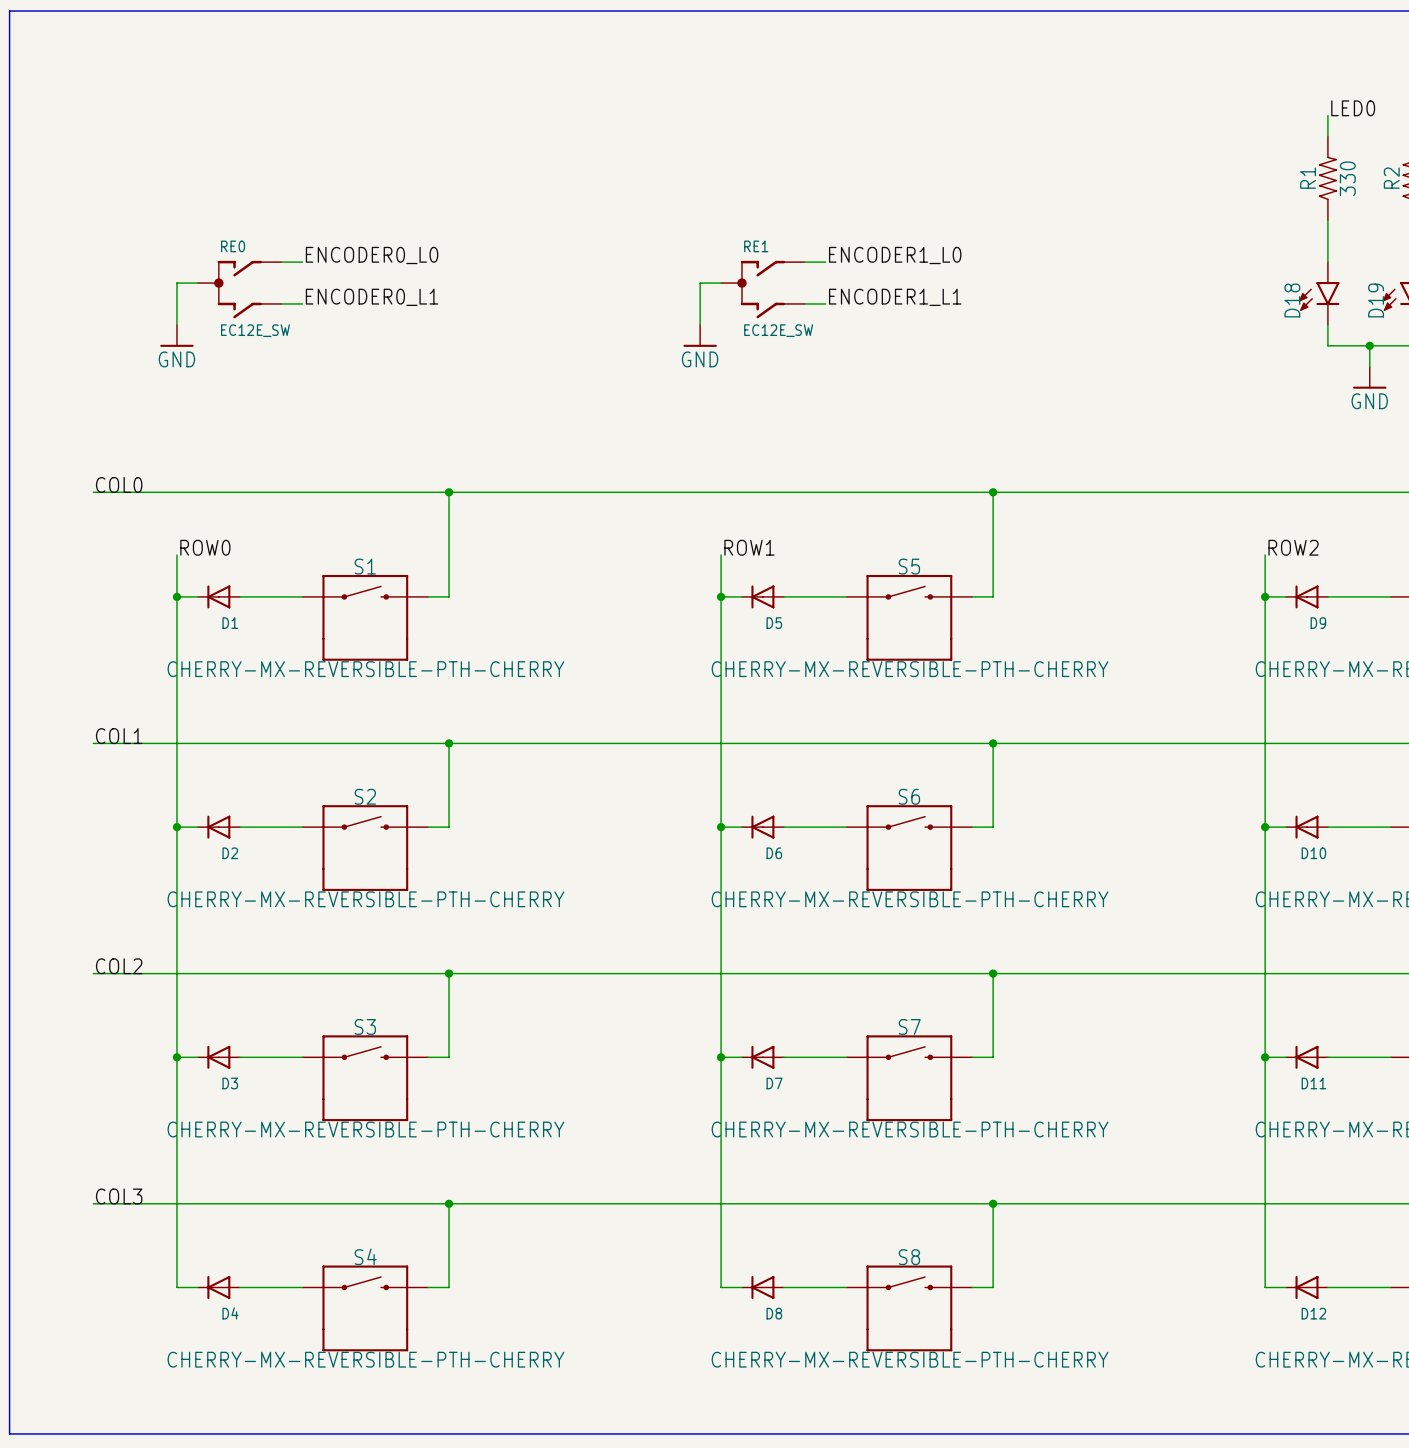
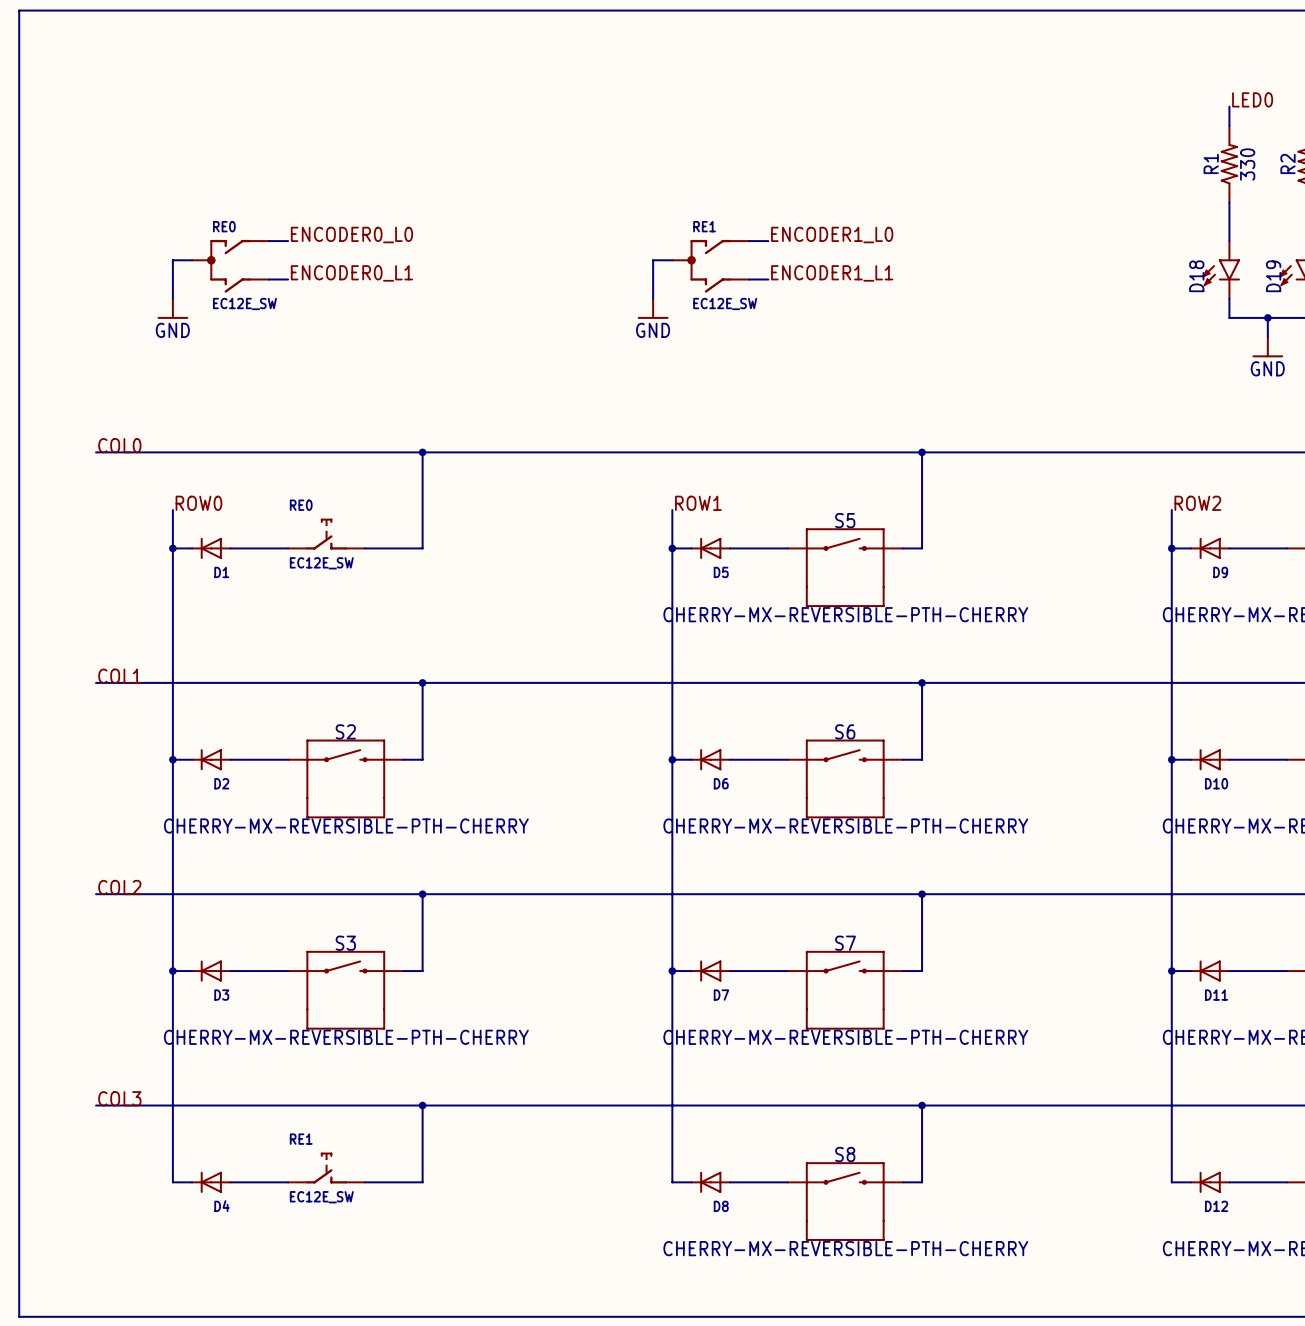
RE0: none -> EC12E_SW (326, 534)
S1: CHERRY-MX-REVERSIBLE-PTH-CHERRY (365, 617) -> none
RE1: none -> EC12E_SW (326, 1168)
S4: CHERRY-MX-REVERSIBLE-PTH-CHERRY (365, 1308) -> none

